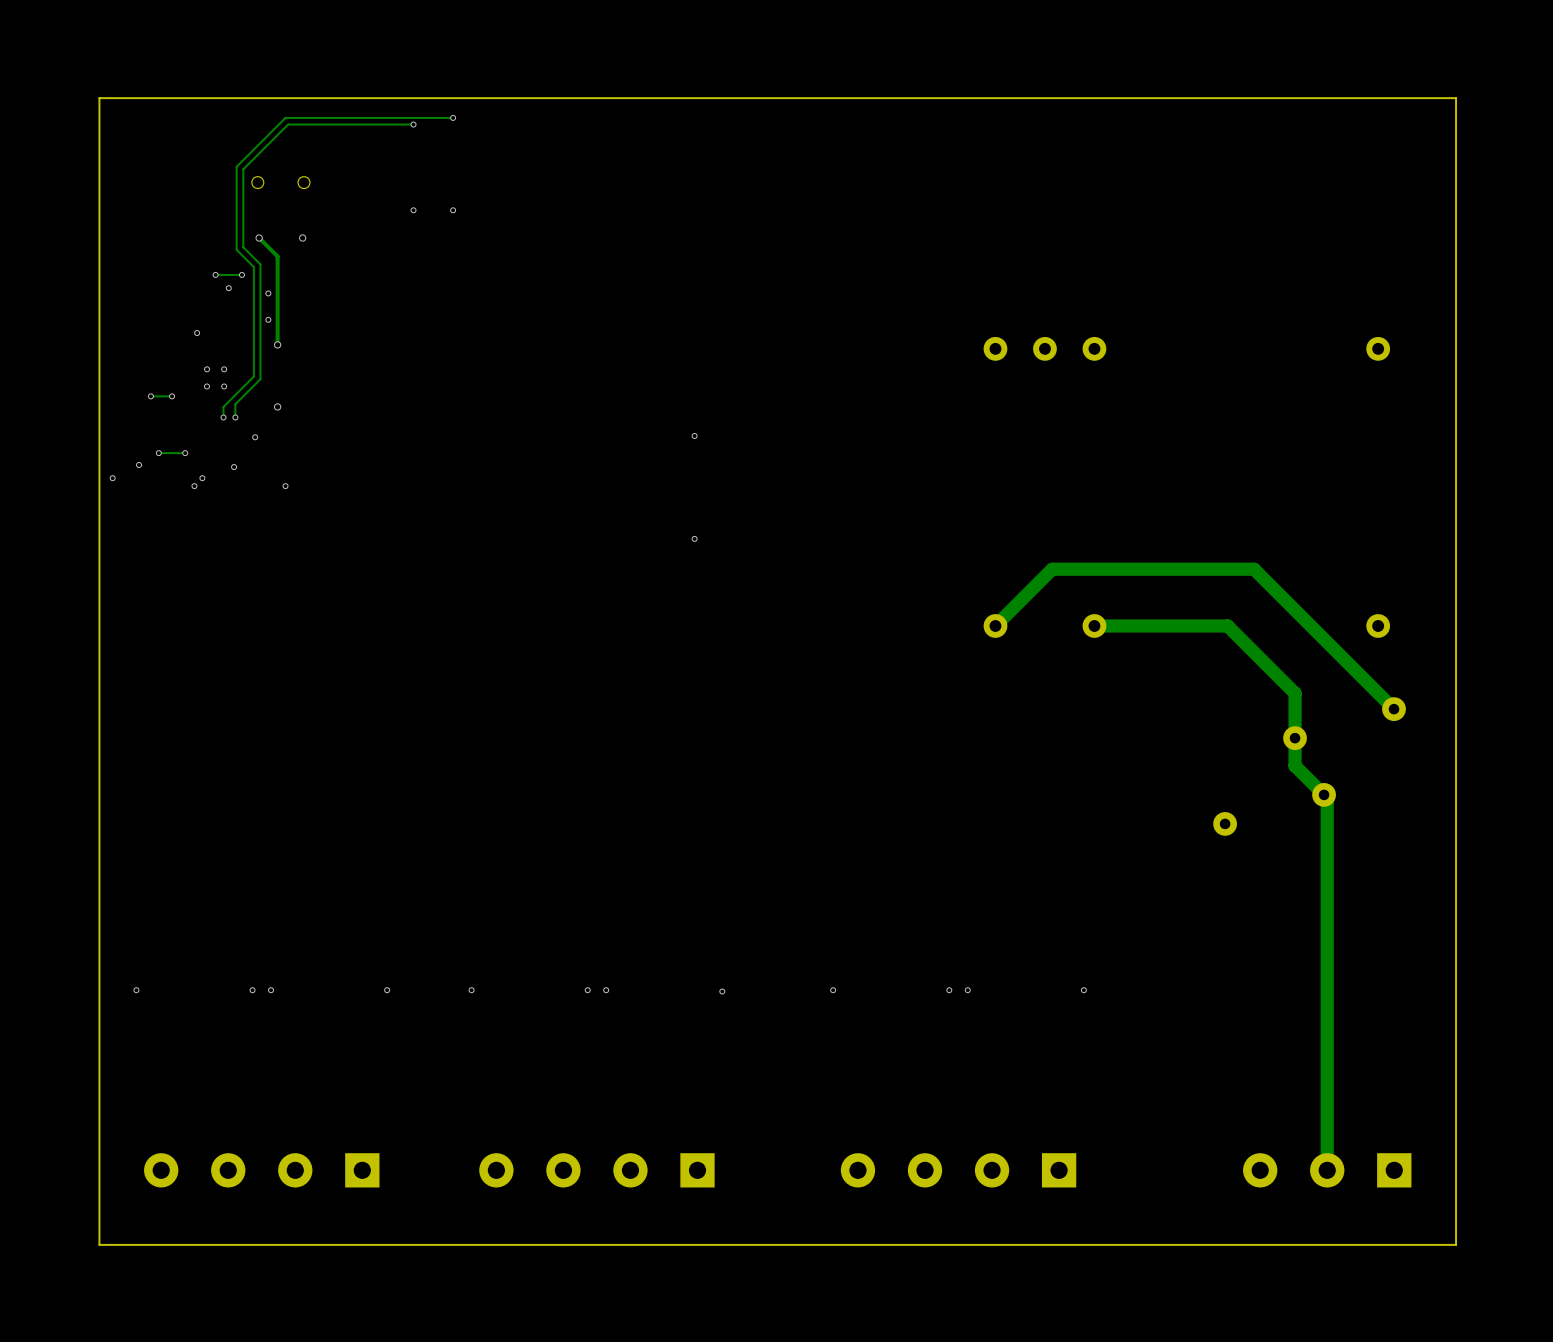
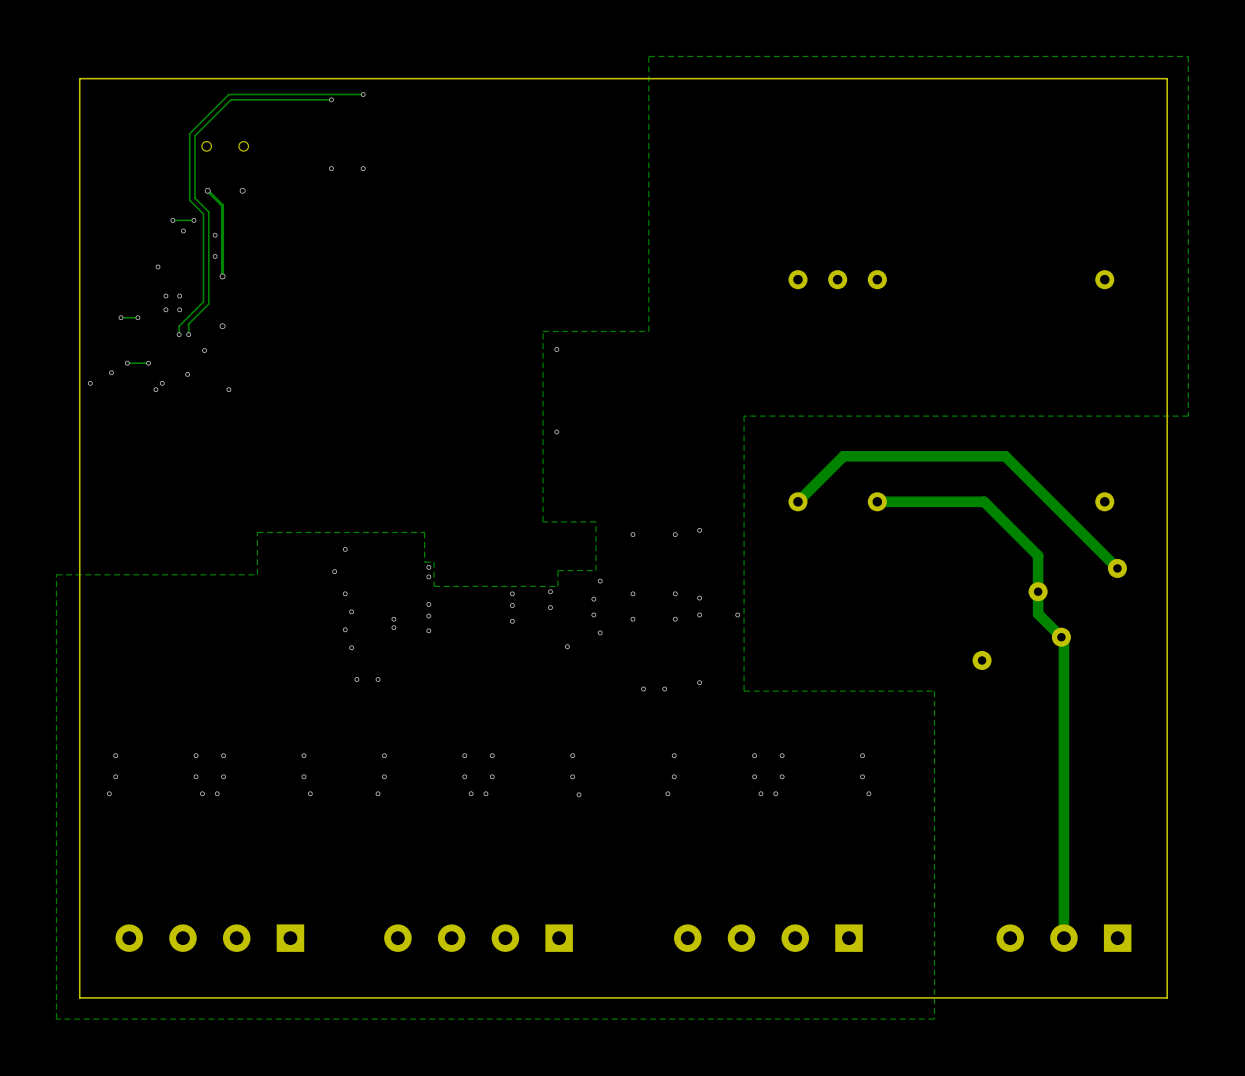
zone outline: none -> (1188, 56) (648, 56) (648, 331) (543, 331) (543, 521) (595, 521) (595, 570) (557, 570) (557, 586) (434, 586) (434, 562) (424, 562) (424, 532) (257, 532) (257, 574) (56, 574) (56, 1019) (934, 1019) (934, 691) (744, 691) (744, 416) (1188, 416) (1188, 56)
via: none -> (699, 530)
via: none -> (632, 534)
via: none -> (675, 534)
via: none -> (345, 549)
via: none -> (428, 567)
via: none -> (334, 571)
via: none -> (428, 576)
via: none -> (600, 581)
via: none -> (550, 591)
via: none -> (345, 593)
via: none -> (512, 593)
via: none -> (632, 593)
via: none -> (675, 593)
via: none -> (699, 598)
via: none -> (593, 599)
via: none -> (428, 604)
via: none -> (512, 605)
via: none -> (550, 607)
via: none -> (351, 611)
via: none -> (593, 614)
via: none -> (699, 614)
via: none -> (737, 614)
via: none -> (428, 616)
via: none -> (393, 619)
via: none -> (632, 619)
via: none -> (675, 619)
via: none -> (512, 621)
via: none -> (393, 627)
via: none -> (345, 629)
via: none -> (428, 630)
via: none -> (600, 632)
via: none -> (567, 646)
via: none -> (351, 647)
via: none -> (356, 679)
via: none -> (378, 679)
via: none -> (699, 682)
via: none -> (643, 689)
via: none -> (664, 689)
via: none -> (115, 755)
via: none -> (196, 755)
via: none -> (223, 755)
via: none -> (303, 755)
via: none -> (384, 755)
via: none -> (464, 755)
via: none -> (492, 755)
via: none -> (572, 755)
via: none -> (674, 755)
via: none -> (754, 755)
via: none -> (782, 755)
via: none -> (862, 755)
via: none -> (115, 776)
via: none -> (196, 776)
via: none -> (223, 776)
via: none -> (303, 776)
via: none -> (384, 776)
via: none -> (464, 776)
via: none -> (492, 776)
via: none -> (572, 776)
via: none -> (674, 776)
via: none -> (754, 776)
via: none -> (782, 776)
via: none -> (862, 776)

